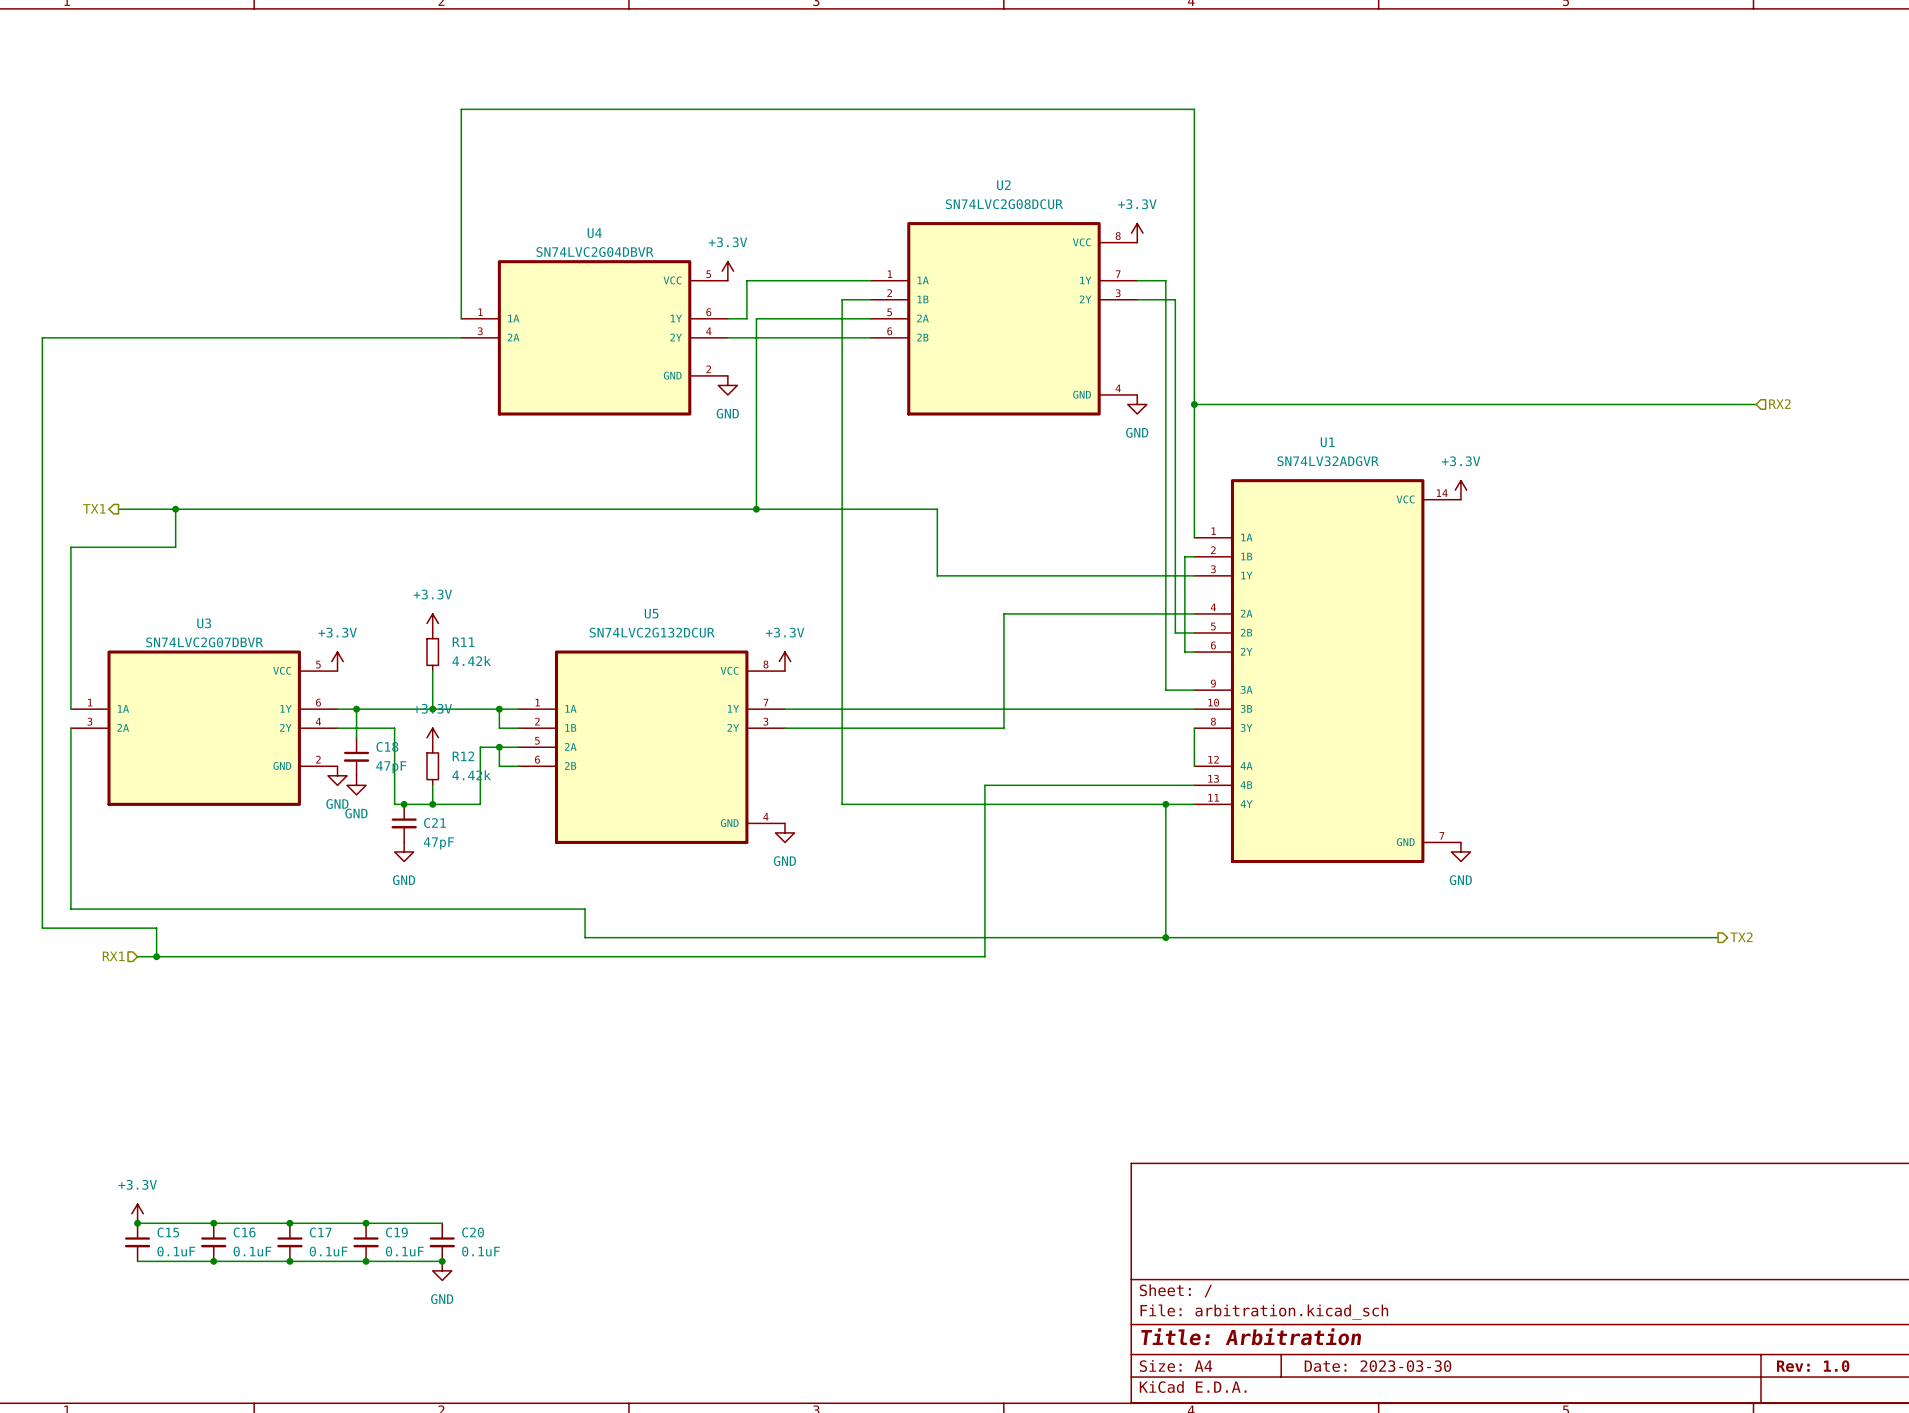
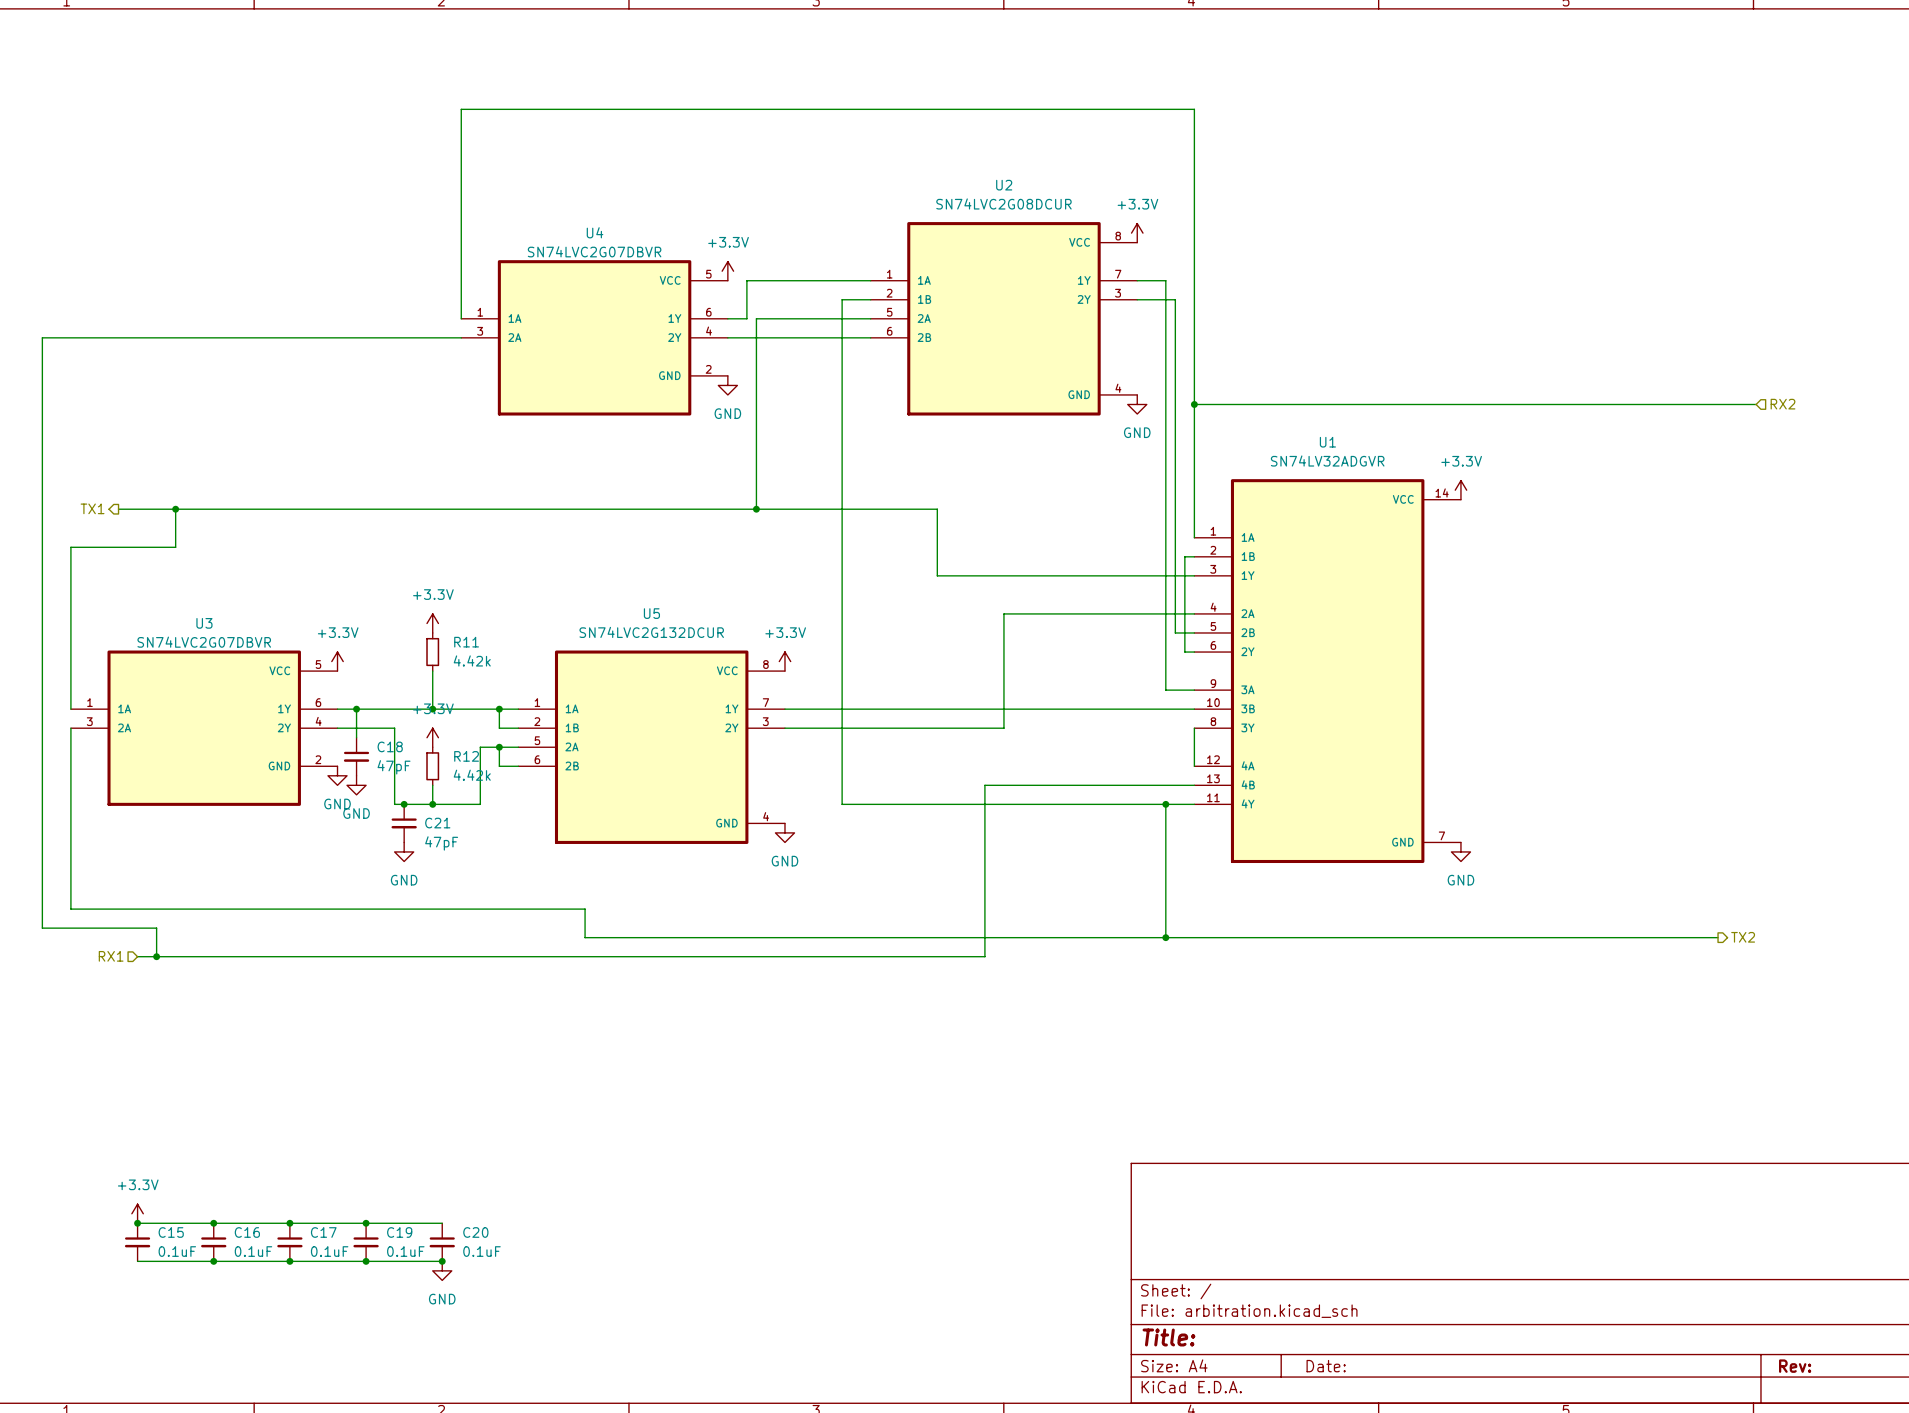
U4 value: SN74LVC2G04DBVR (595, 252) -> SN74LVC2G07DBVR (594, 251)
title block: Title: Arbitration (1251, 1336) -> Title: (1168, 1337)
title block: Date: 2023-03-30 (1377, 1366) -> Date: (1326, 1366)
title block: Rev: 1.0 (1813, 1366) -> Rev: (1795, 1366)

